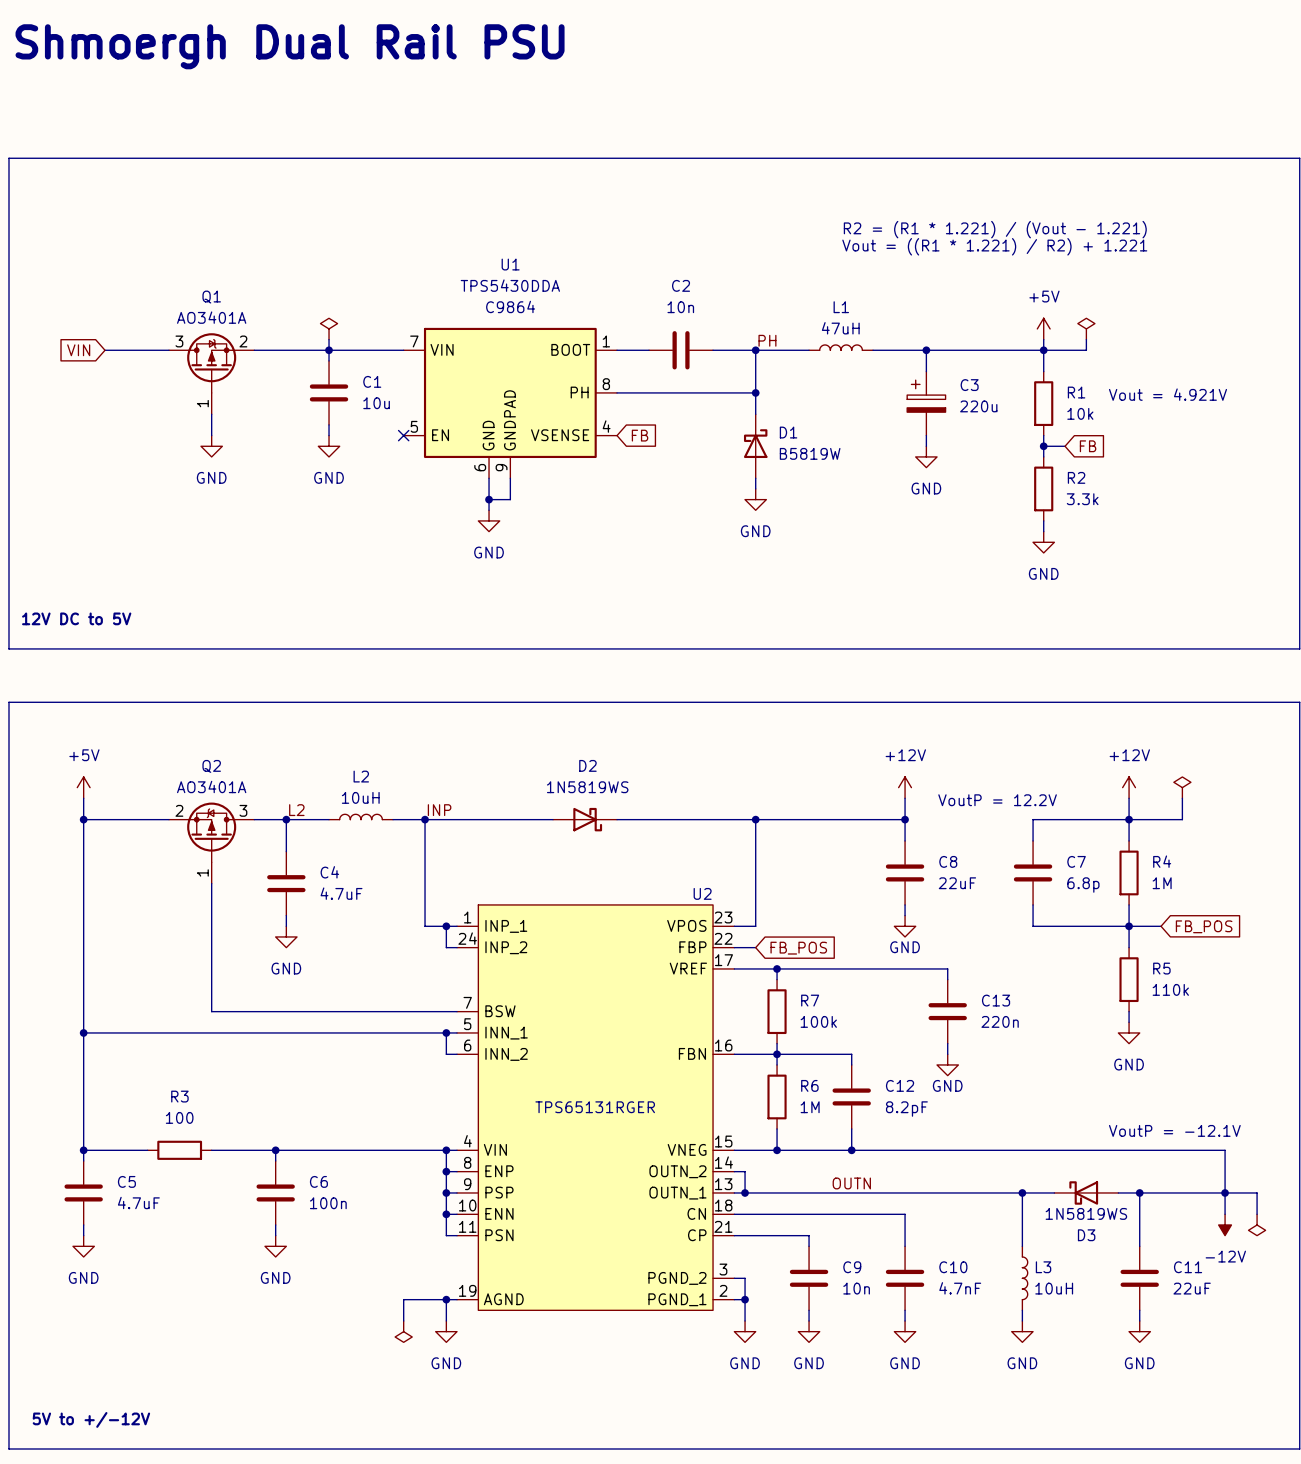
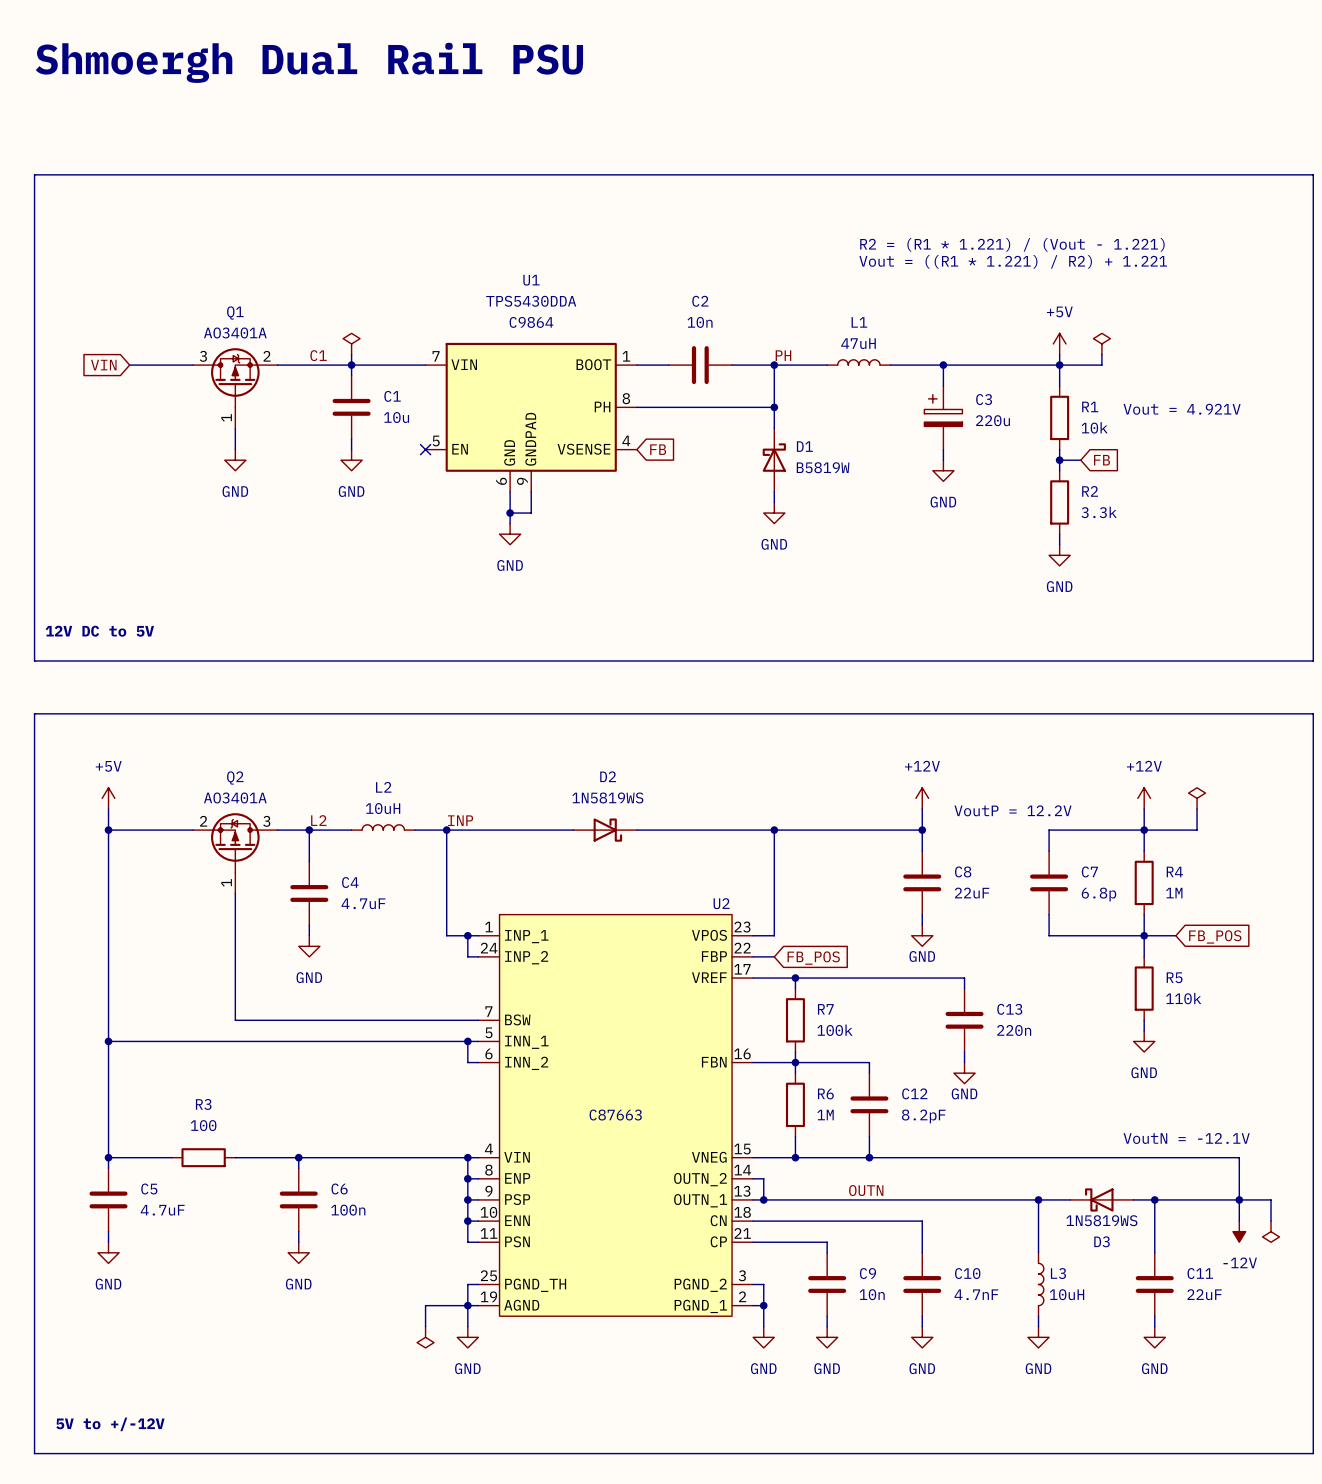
label: none -> C1 (318, 355)
U2 symbol: [457, 904, 735, 1311] -> [478, 914, 754, 1317]
U2 text: TPS65131RGER (595, 1107) -> C87663 (615, 1115)
text: VoutP = -12.1V (1174, 1130) -> VoutN = -12.1V (1186, 1138)
wire: none -> (478, 1284) (467, 1284) (467, 1305)

